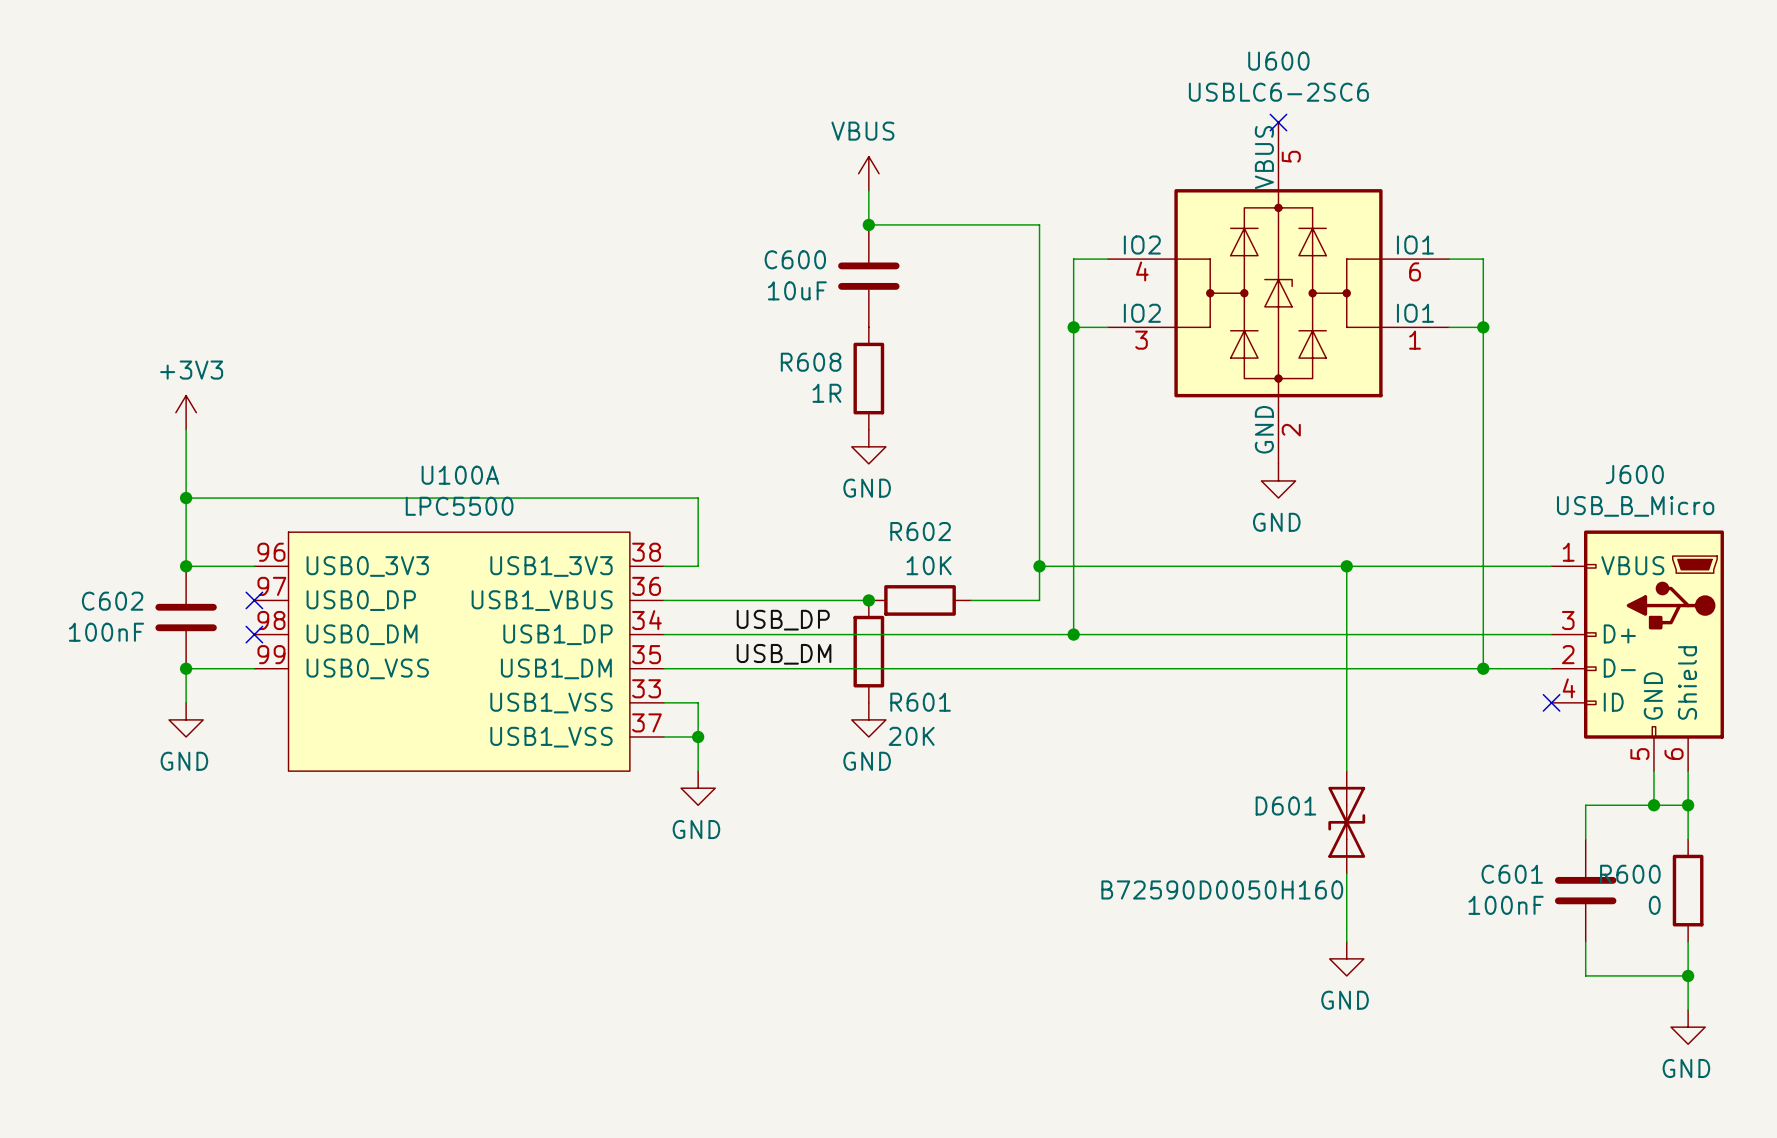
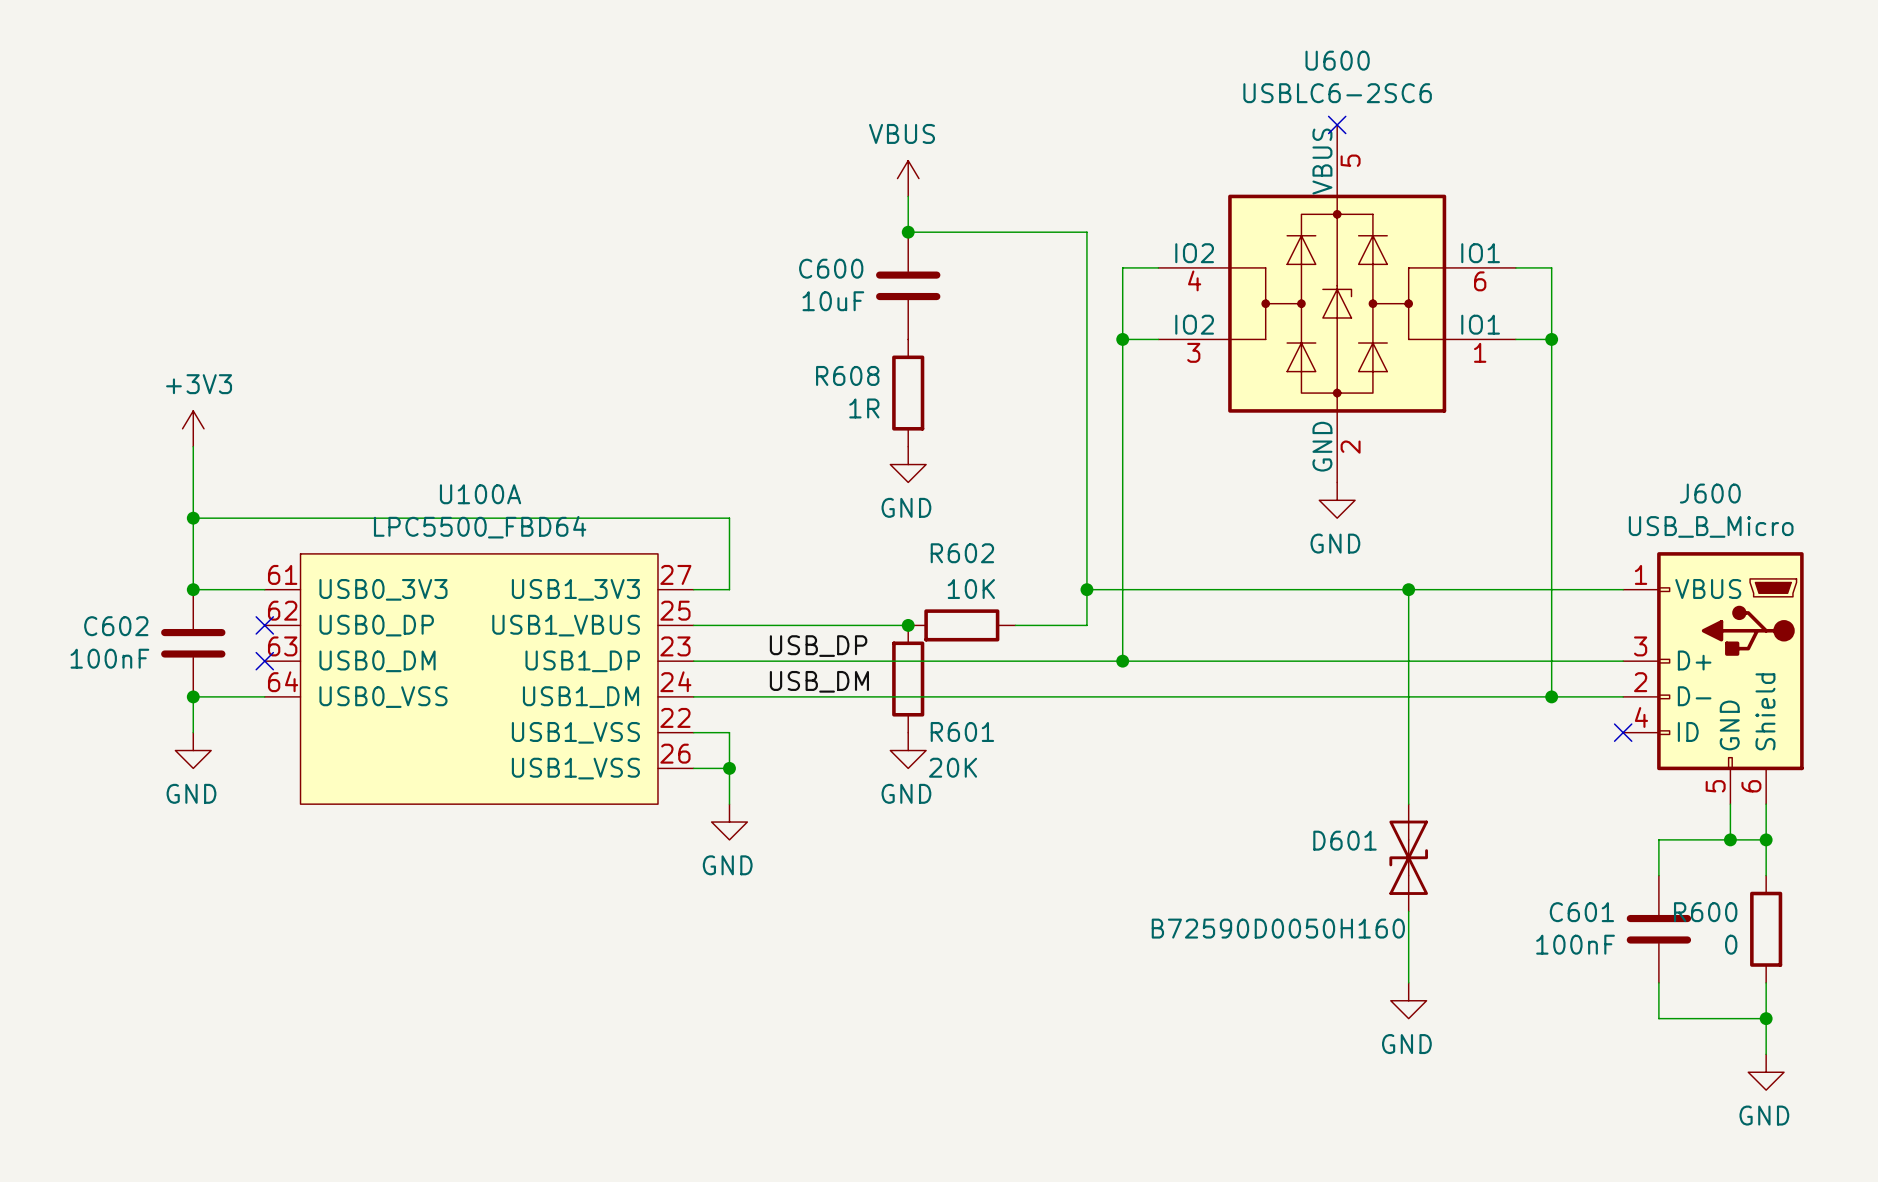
U100A value: LPC5500 (459, 506) -> LPC5500_FBD64 (480, 527)
U100A symbol: [254, 532, 665, 772] -> [264, 553, 694, 805]

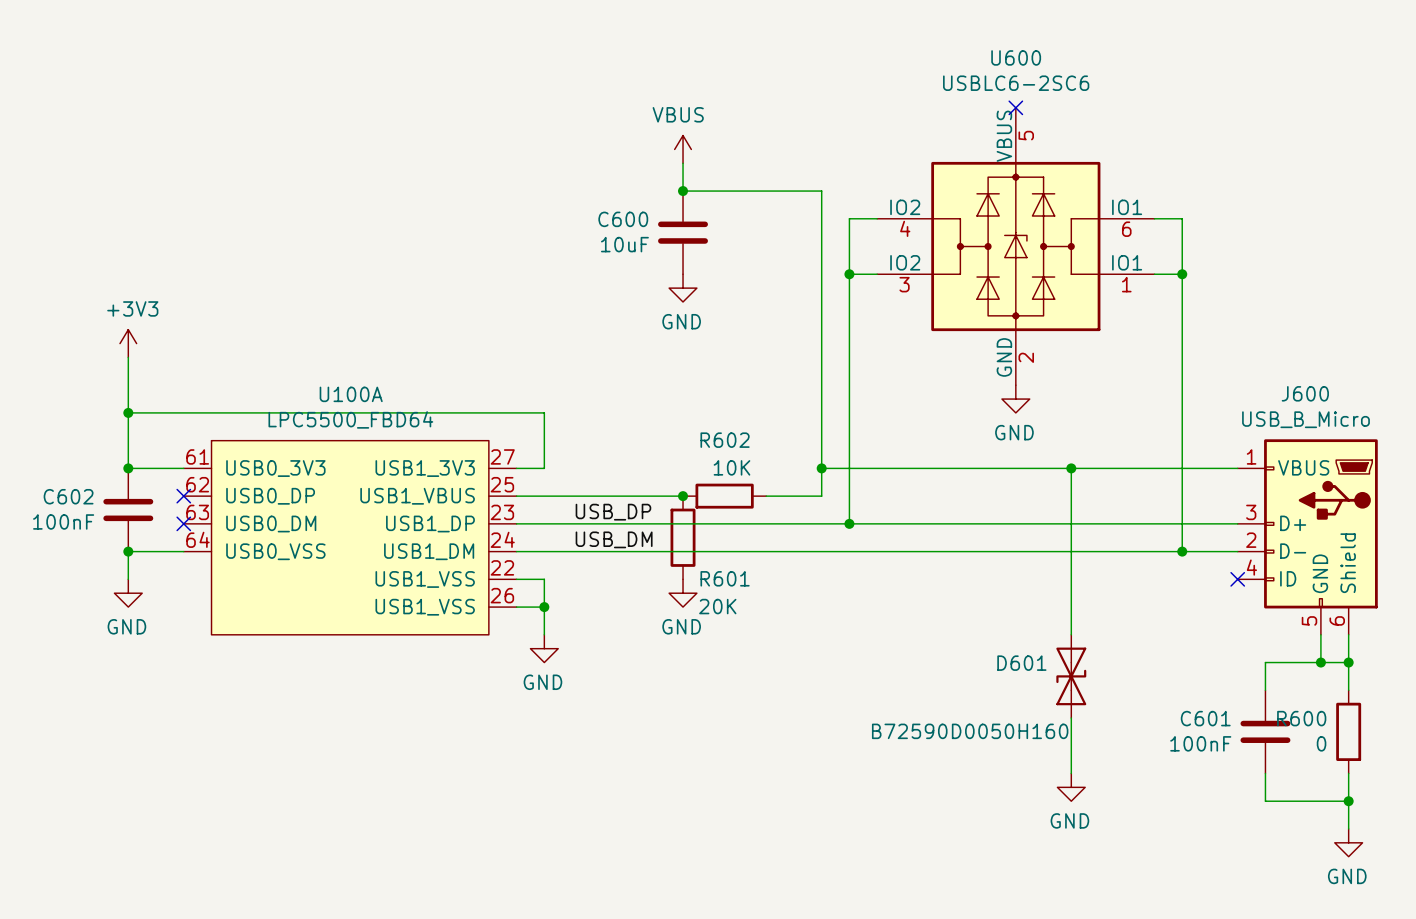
R608: 1R (908, 393) -> none
power symbol position: GND (908, 464) -> GND (683, 288)

